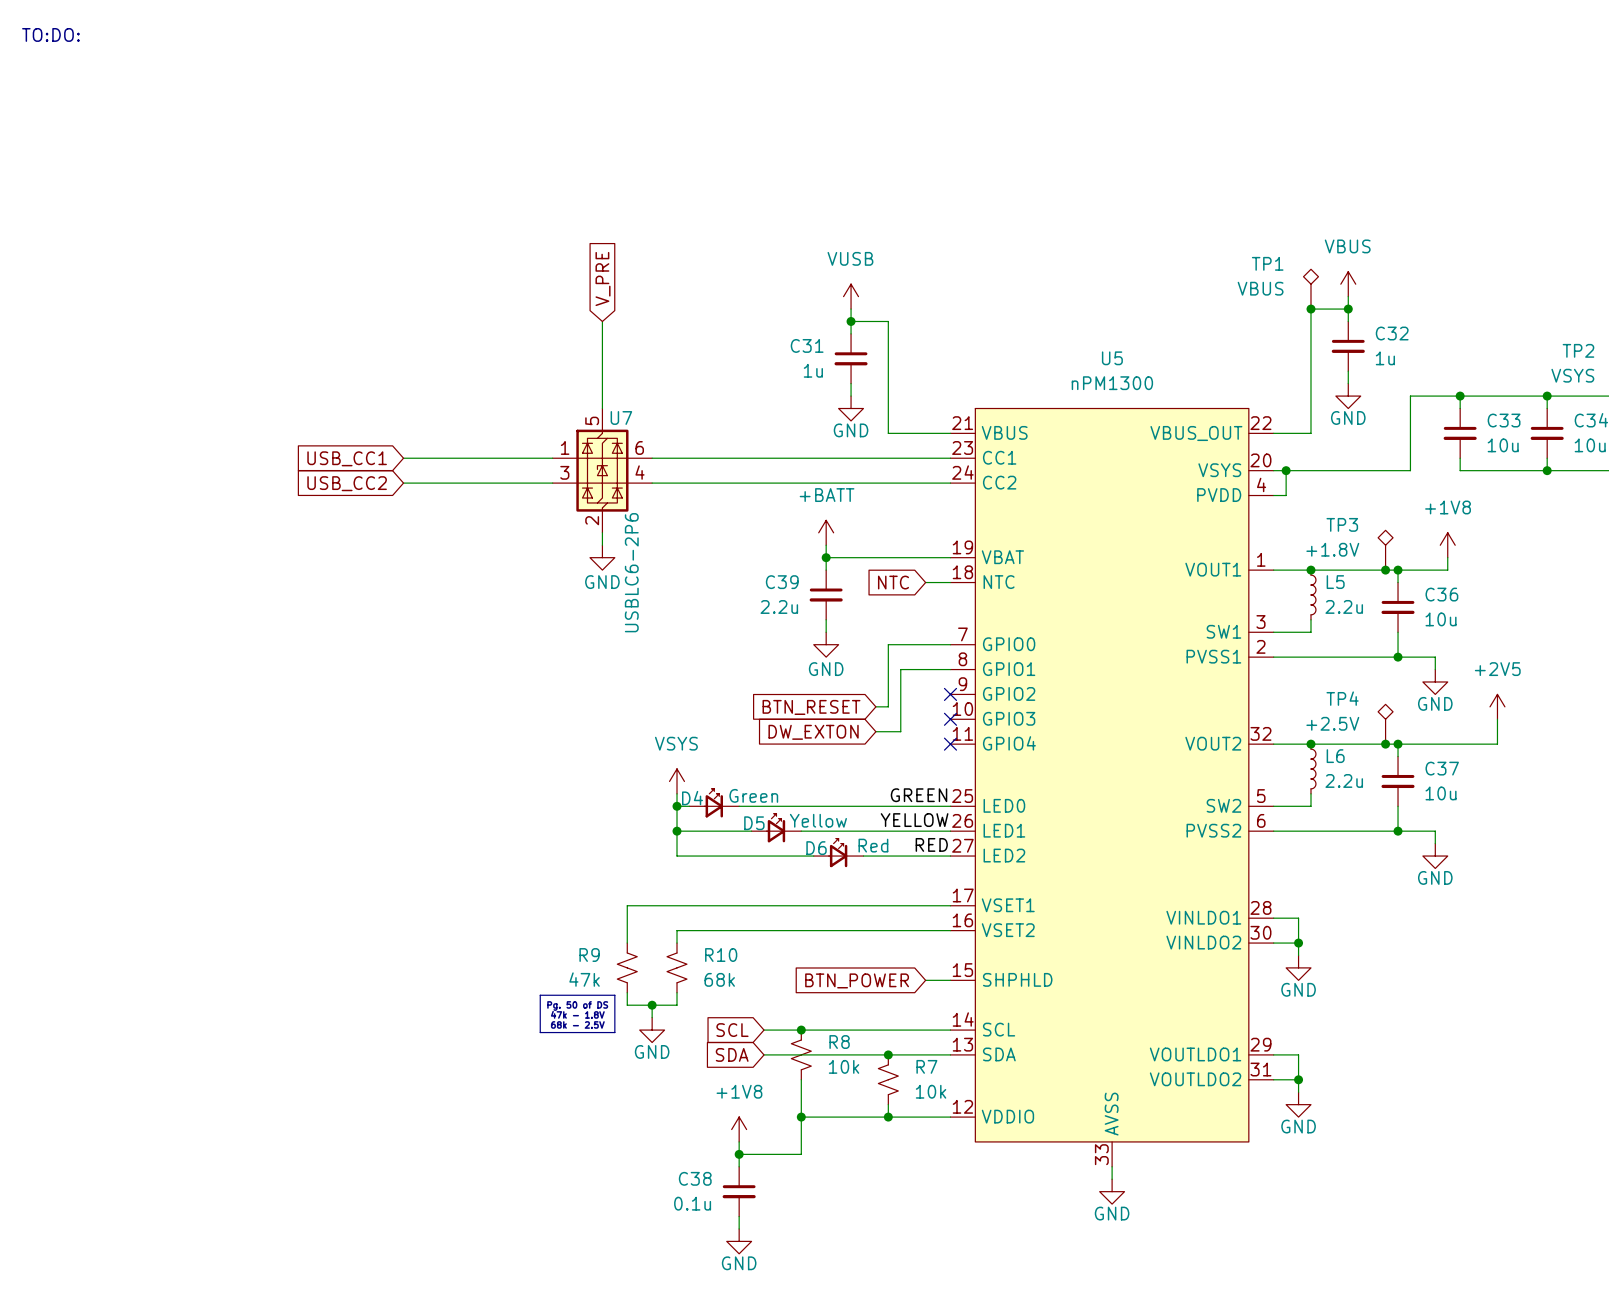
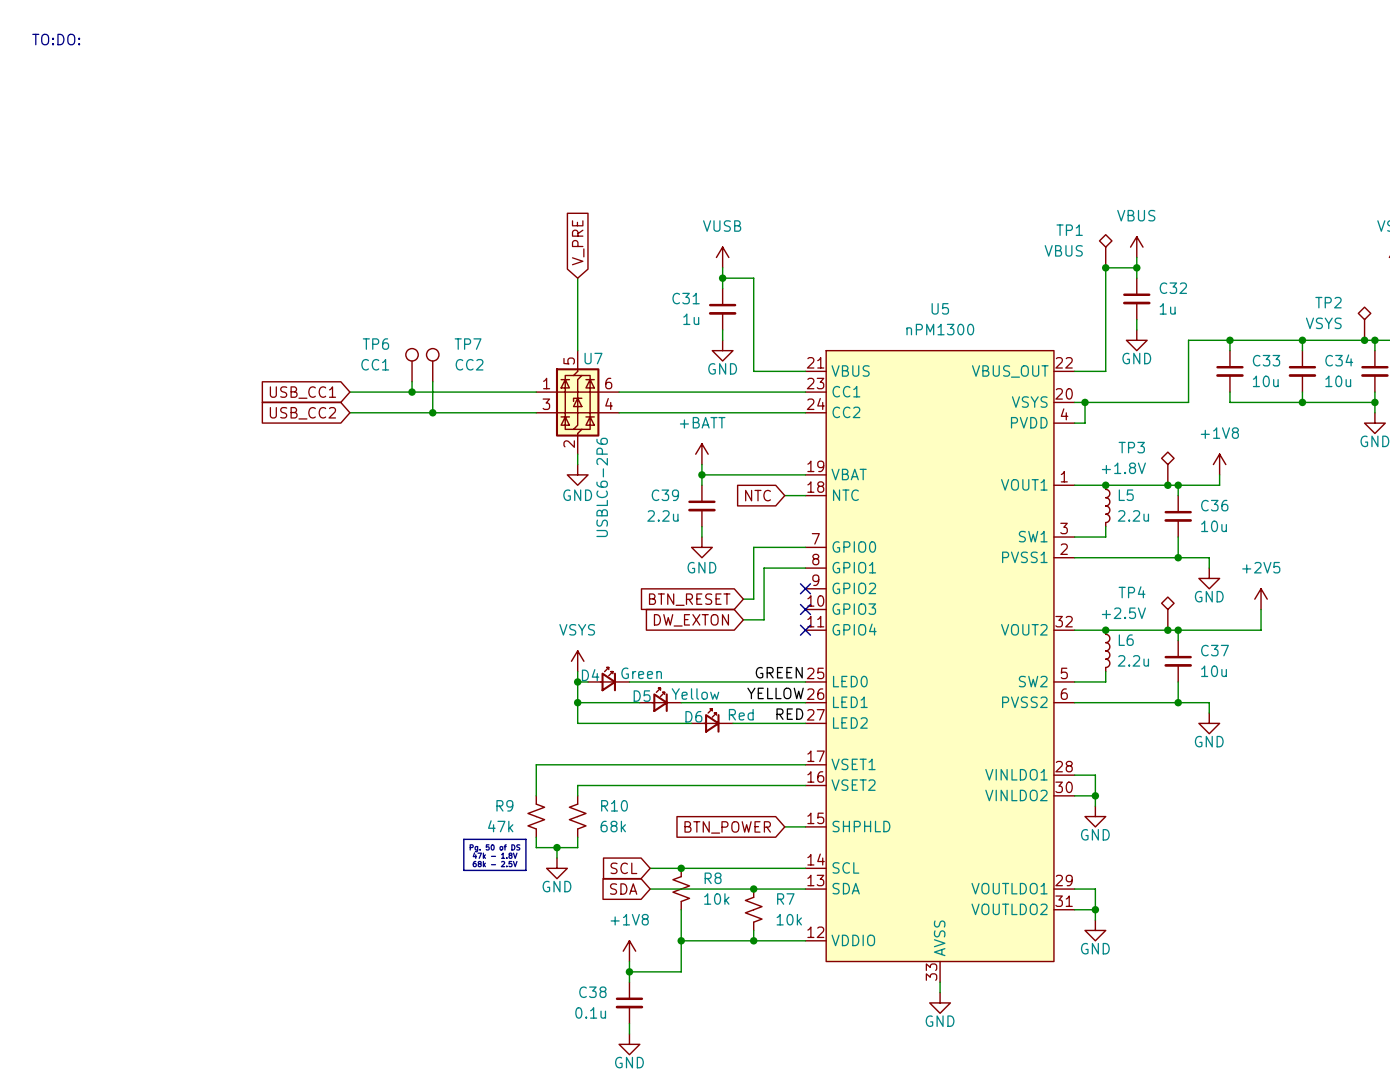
global label position: V_PRE (603, 278) -> V_PRE (578, 242)
wire: (602, 321) (602, 408) -> (577, 278) (577, 350)
TP6: none -> CC1 (412, 365)
TP7: none -> CC2 (432, 365)
wire: none -> (412, 381) (412, 392)
wire: none -> (432, 381) (432, 412)
junction: none -> (412, 392)
U7 position: (602, 470) -> (577, 402)
junction: none -> (432, 412)
wire: (602, 532) (602, 545) -> (577, 454) (577, 464)
power symbol position: GND (602, 557) -> GND (577, 474)

